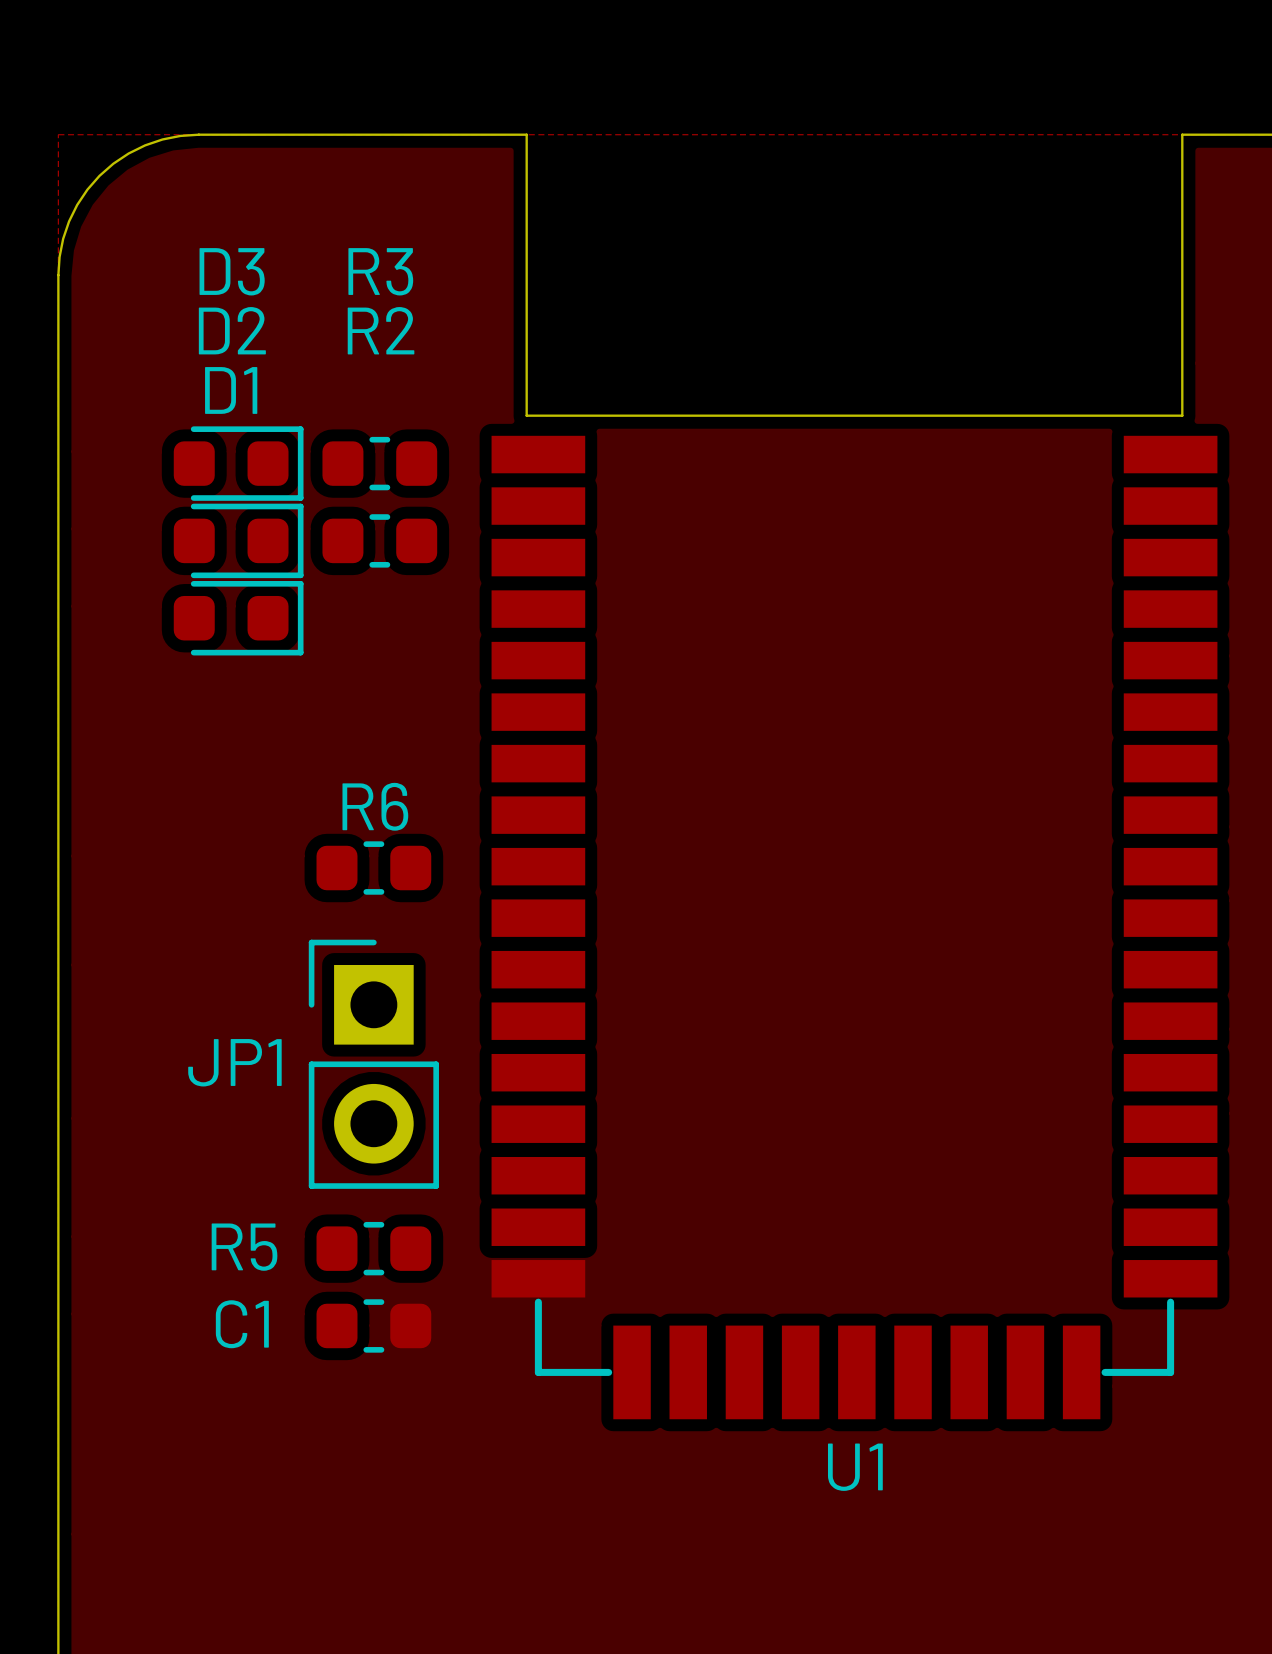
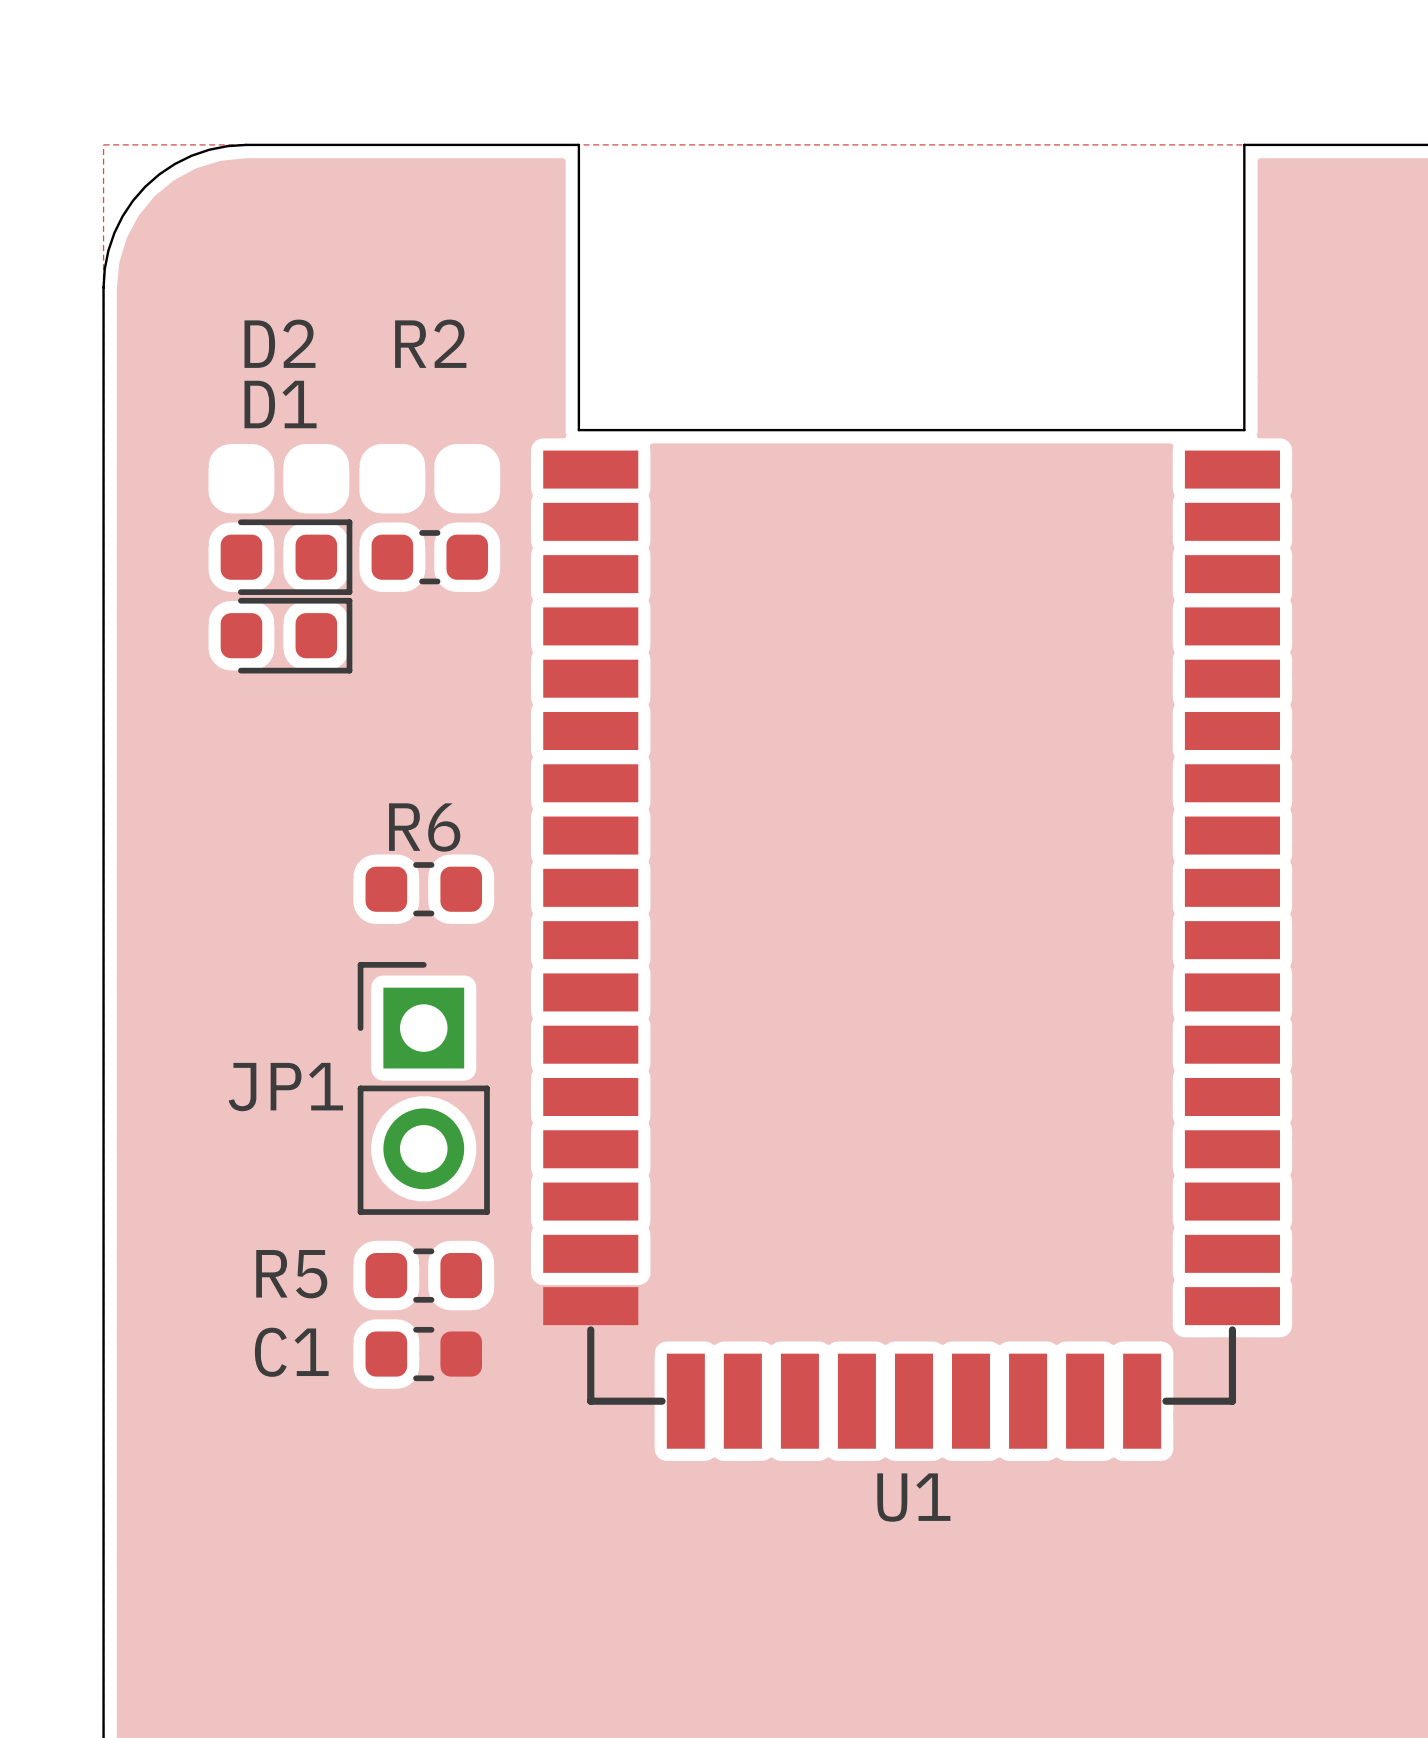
D3: (238, 463) -> none
R3: (379, 463) -> none

